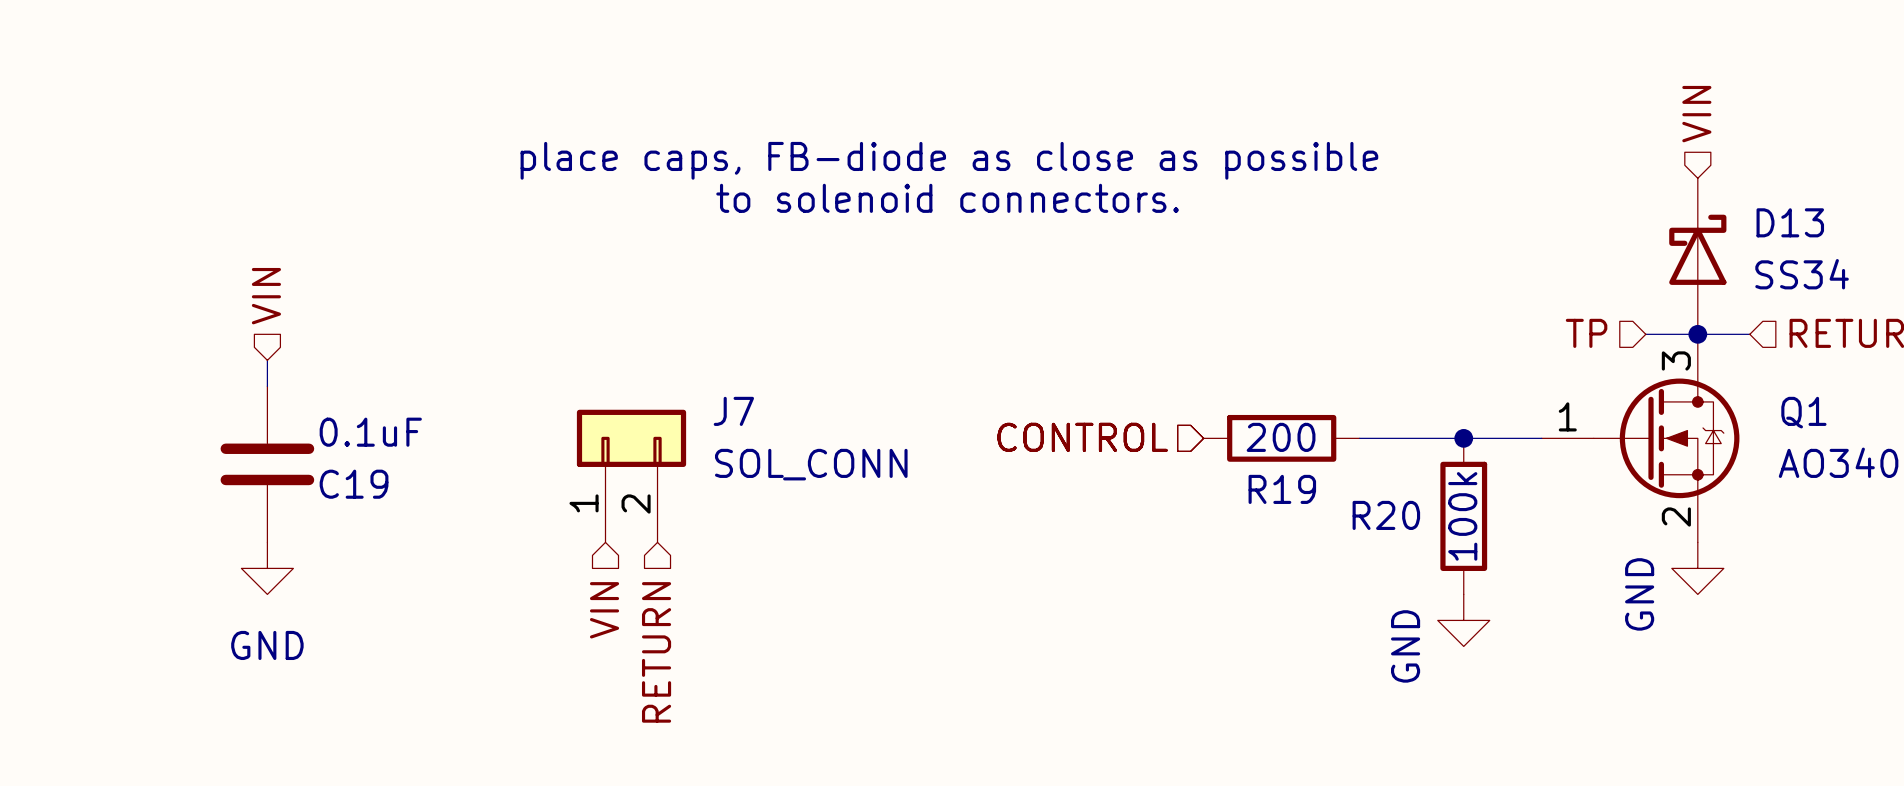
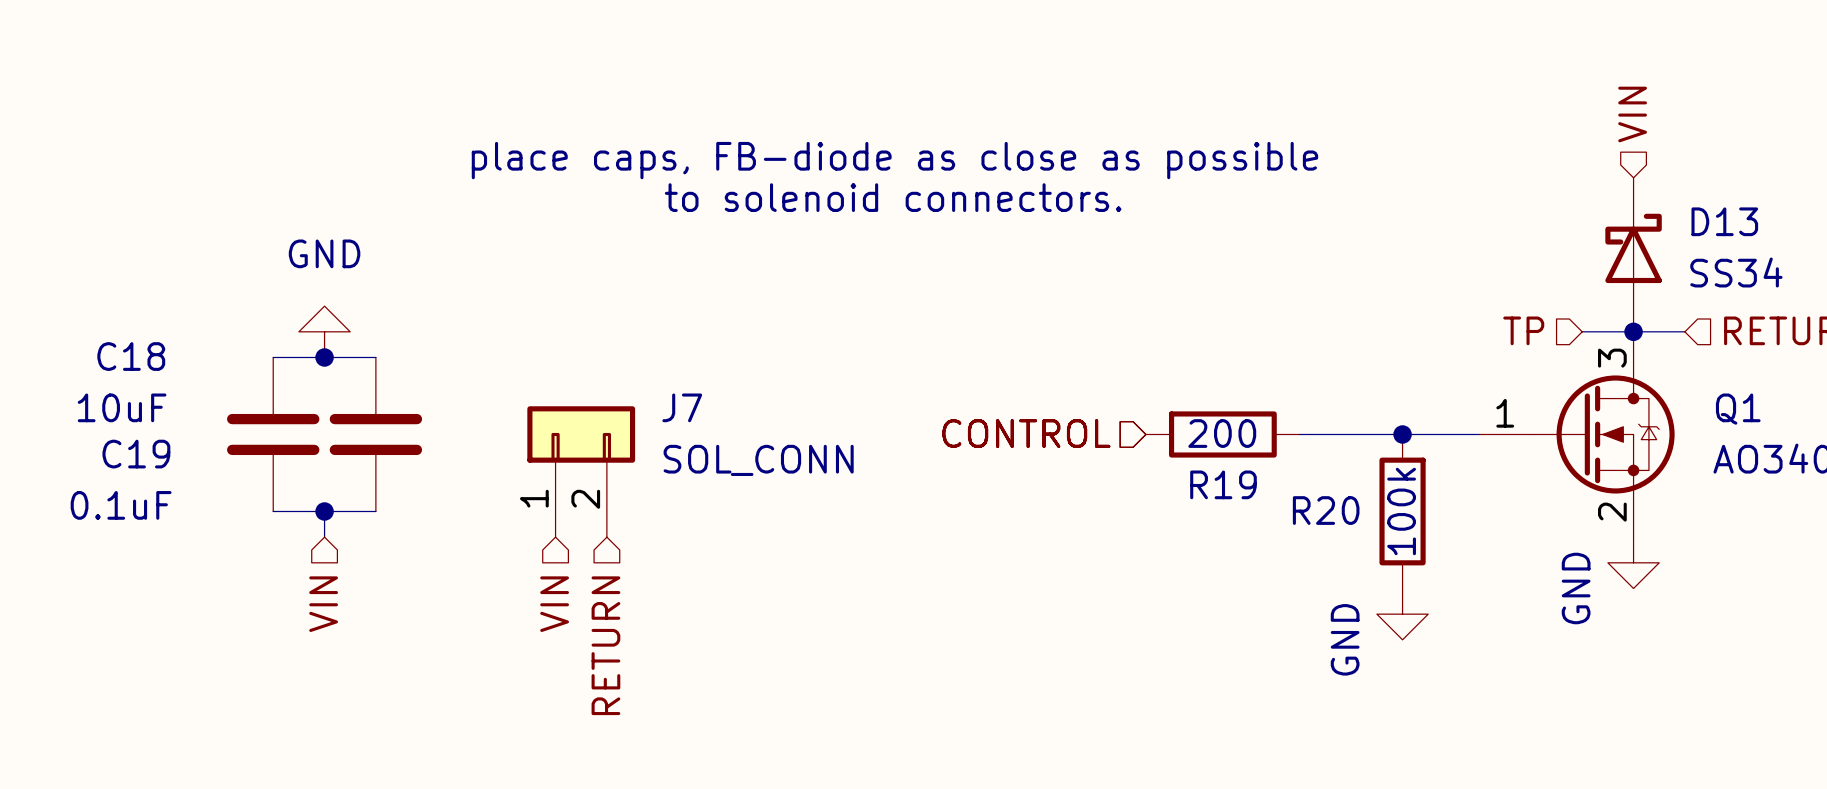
hierarchical label rotation: 0° (266, 296) -> 180° (323, 604)
hierarchical label position: VIN (266, 296) -> VIN (323, 604)
wire: (267, 360) (267, 386) -> (324, 511) (324, 537)
wire: none -> (273, 357) (375, 357)
junction: none -> (324, 357)
C19 value position: 0.1uF (370, 432) -> 0.1uF (121, 505)
C18: none -> 10uF (273, 434)
C19 position: (267, 464) -> (375, 434)
C19 name position: C19 (354, 484) -> C19 (136, 454)
wire: none -> (273, 511) (375, 511)
junction: none -> (324, 511)
power symbol rotation: 0° (267, 568) -> 180° (324, 331)
power symbol position: GND (267, 568) -> GND (324, 331)

